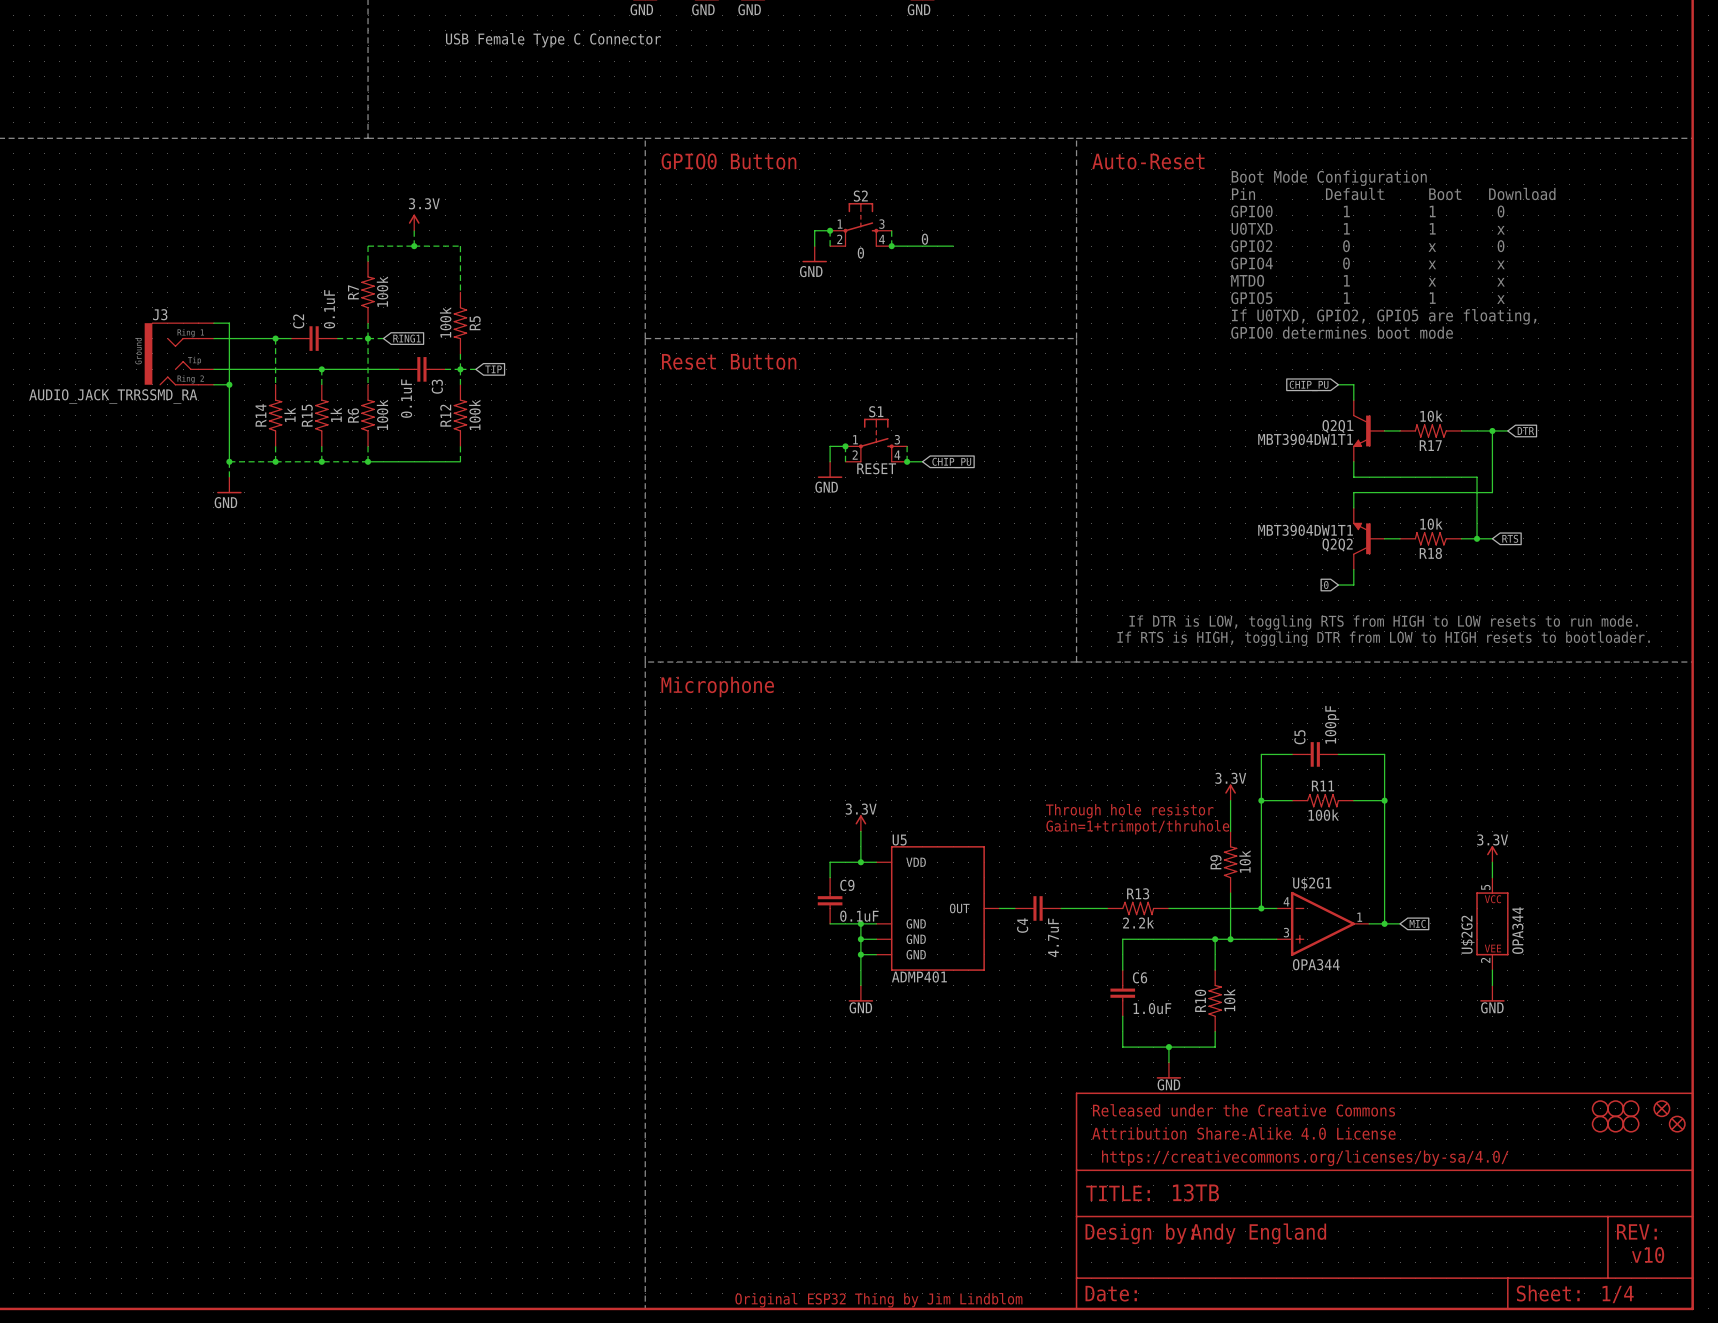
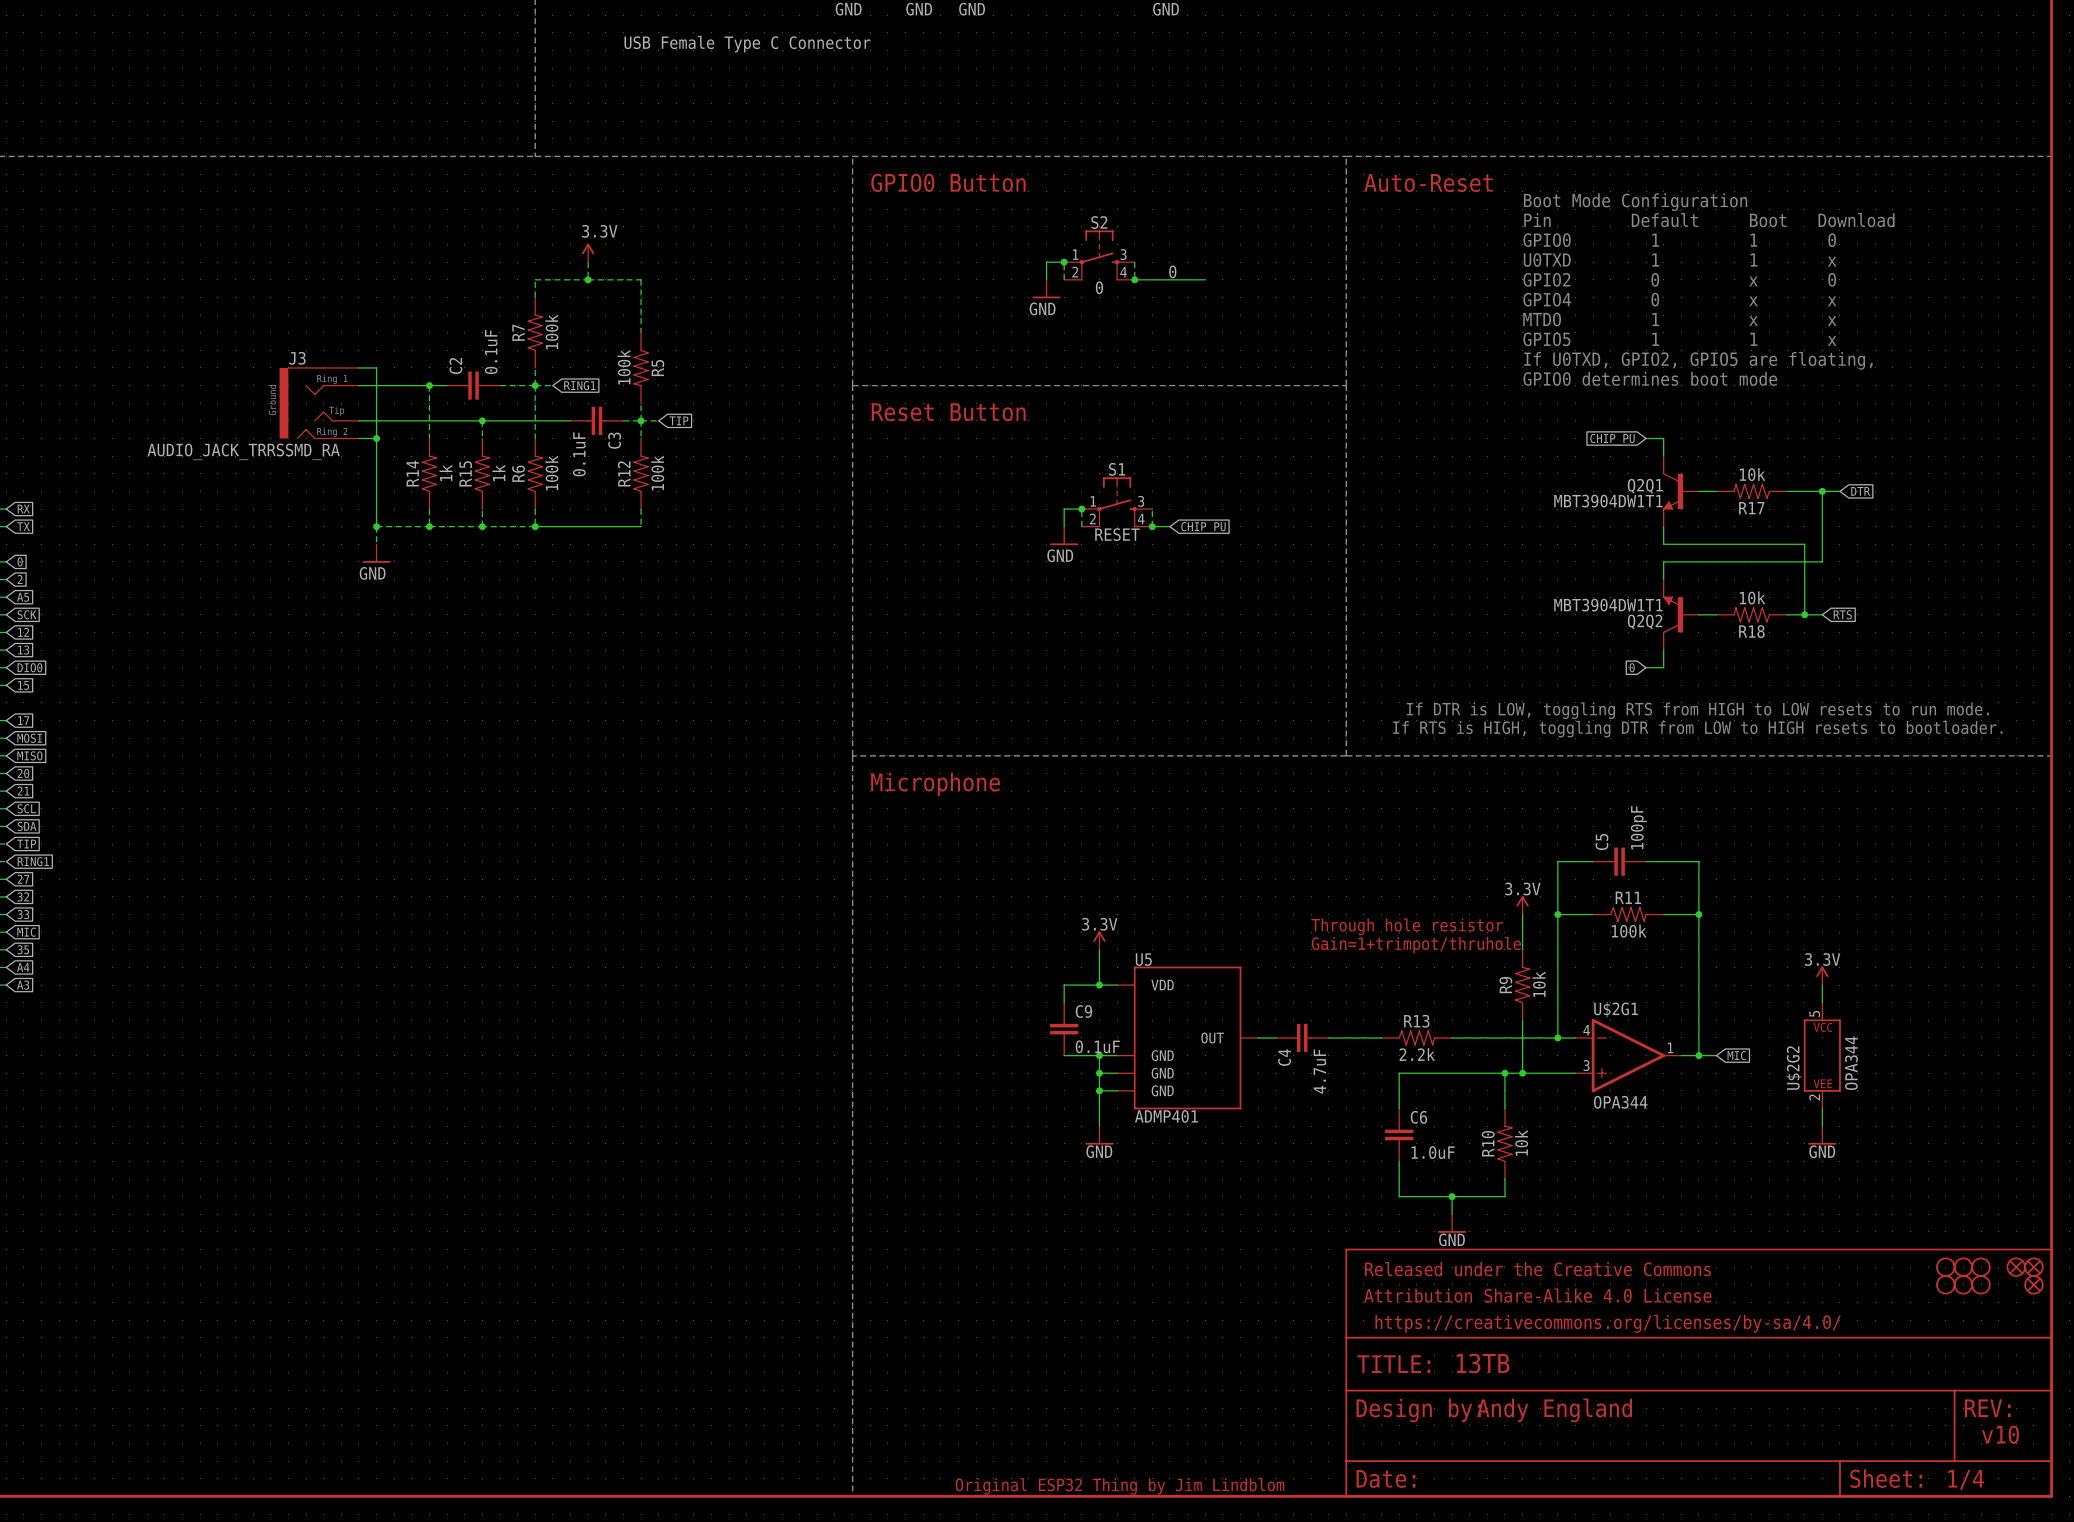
part: none -> (2033, 1267)

